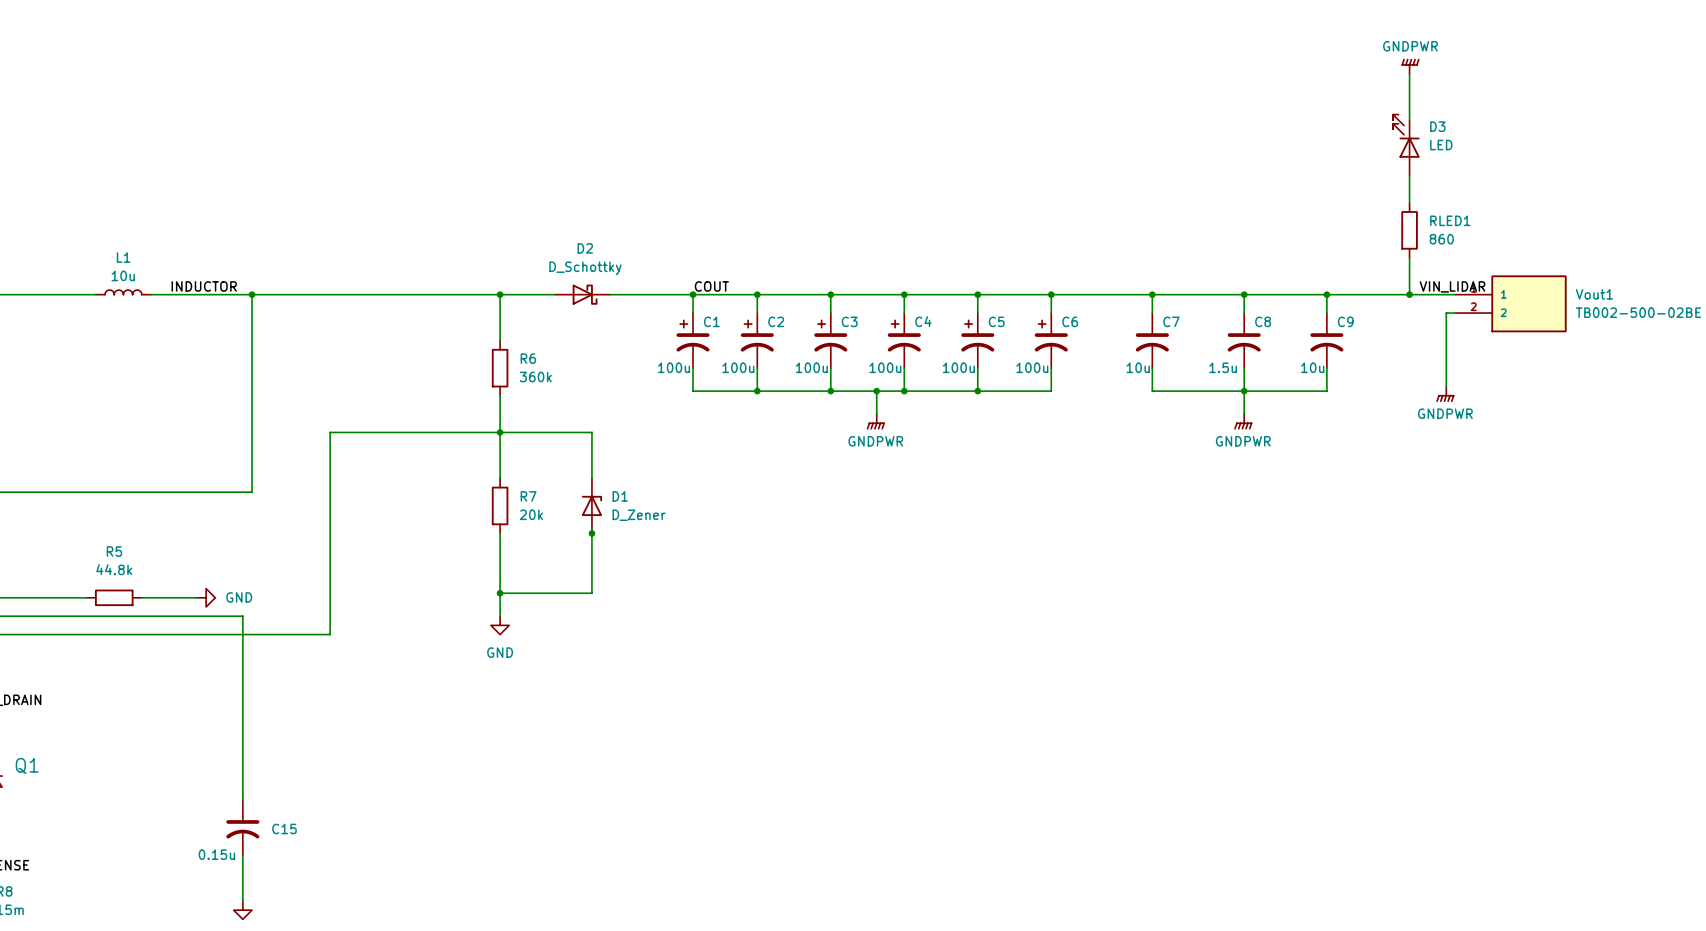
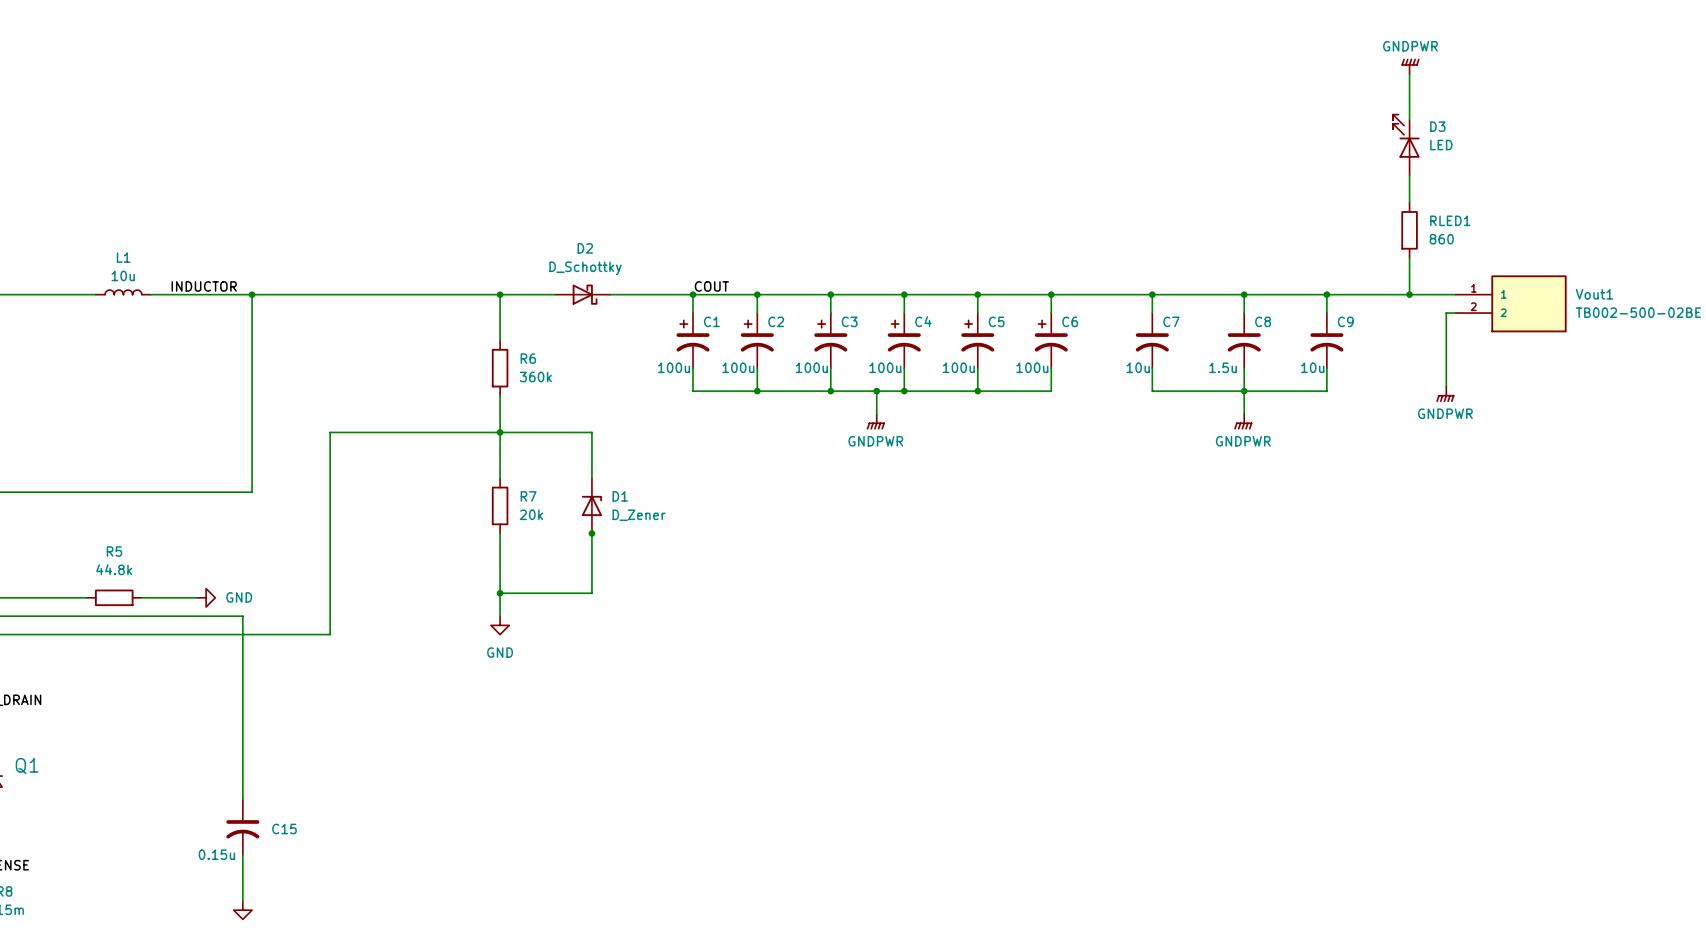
label: VIN_LIDAR (1452, 286) -> none

